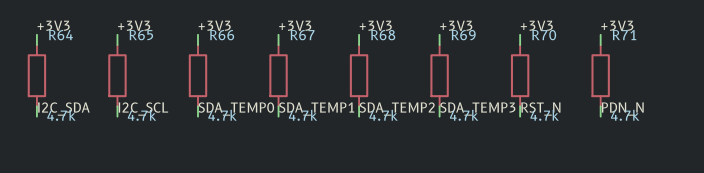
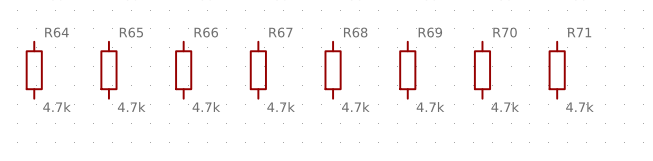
label: +3V3 (53, 25) -> none
label: +3V3 (134, 25) -> none
label: +3V3 (214, 25) -> none
label: +3V3 (295, 25) -> none
label: +3V3 (375, 25) -> none
label: +3V3 (456, 25) -> none
label: +3V3 (536, 25) -> none
label: +3V3 (617, 25) -> none
wire: (36, 34) (36, 45) -> none
wire: (117, 34) (117, 45) -> none
wire: (198, 34) (198, 45) -> none
wire: (278, 34) (278, 45) -> none
wire: (359, 34) (359, 45) -> none
wire: (439, 34) (439, 45) -> none
wire: (520, 34) (520, 45) -> none
wire: (600, 34) (600, 45) -> none
wire: (36, 106) (36, 116) -> none
wire: (117, 106) (117, 116) -> none
wire: (198, 106) (198, 116) -> none
wire: (278, 106) (278, 116) -> none
wire: (359, 106) (359, 116) -> none
wire: (439, 106) (439, 116) -> none
wire: (520, 106) (520, 116) -> none
wire: (600, 106) (600, 116) -> none
label: I2C_SDA (63, 109) -> none
label: I2C_SCL (143, 109) -> none
label: SDA_TEMP0 (236, 109) -> none
label: SDA_TEMP1 (316, 109) -> none
label: SDA_TEMP2 (397, 109) -> none
label: SDA_TEMP3 (477, 109) -> none
label: RST_N (540, 109) -> none
label: PDN_N (622, 109) -> none

